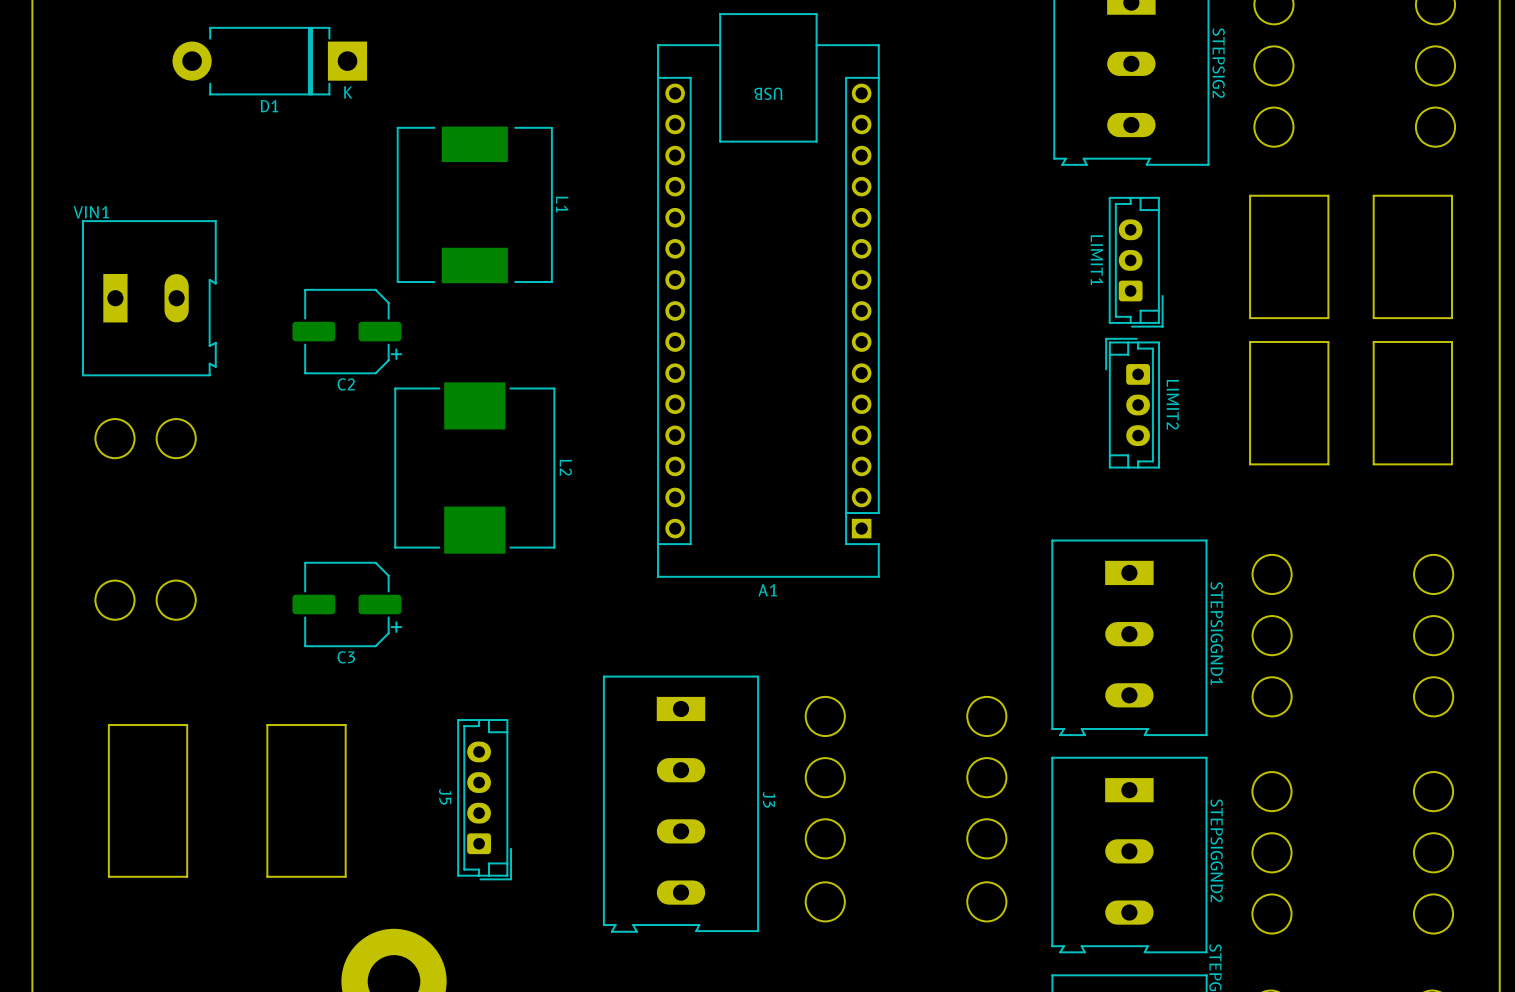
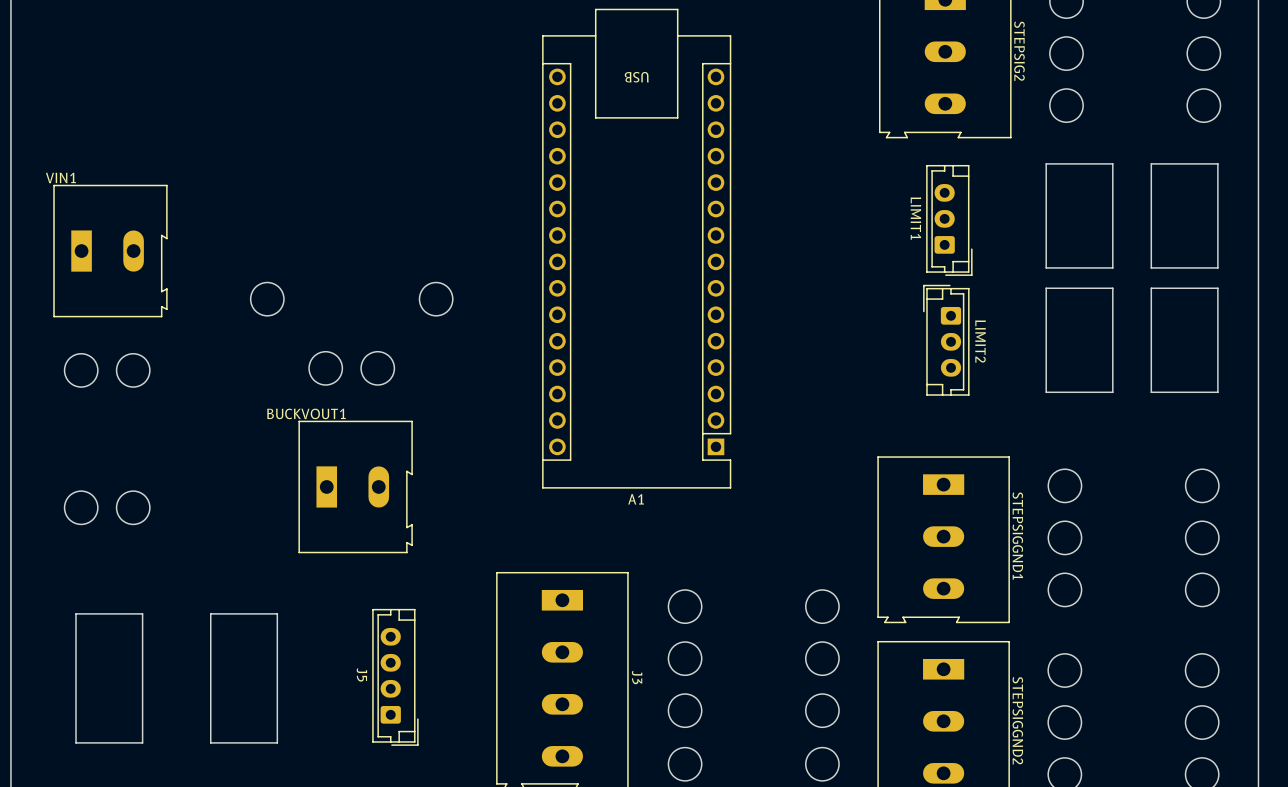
D1: (269, 61) -> none
L1: (474, 204) -> none
C2: (347, 331) -> none
round board edge: none -> [250, 282, 285, 317]
round board edge: none -> [418, 282, 454, 317]
round board edge: none -> [308, 351, 343, 386]
round board edge: none -> [360, 351, 395, 386]
L2: (474, 468) -> none
BUCKVOUT1: none -> (355, 486)
C3: (347, 604) -> none

